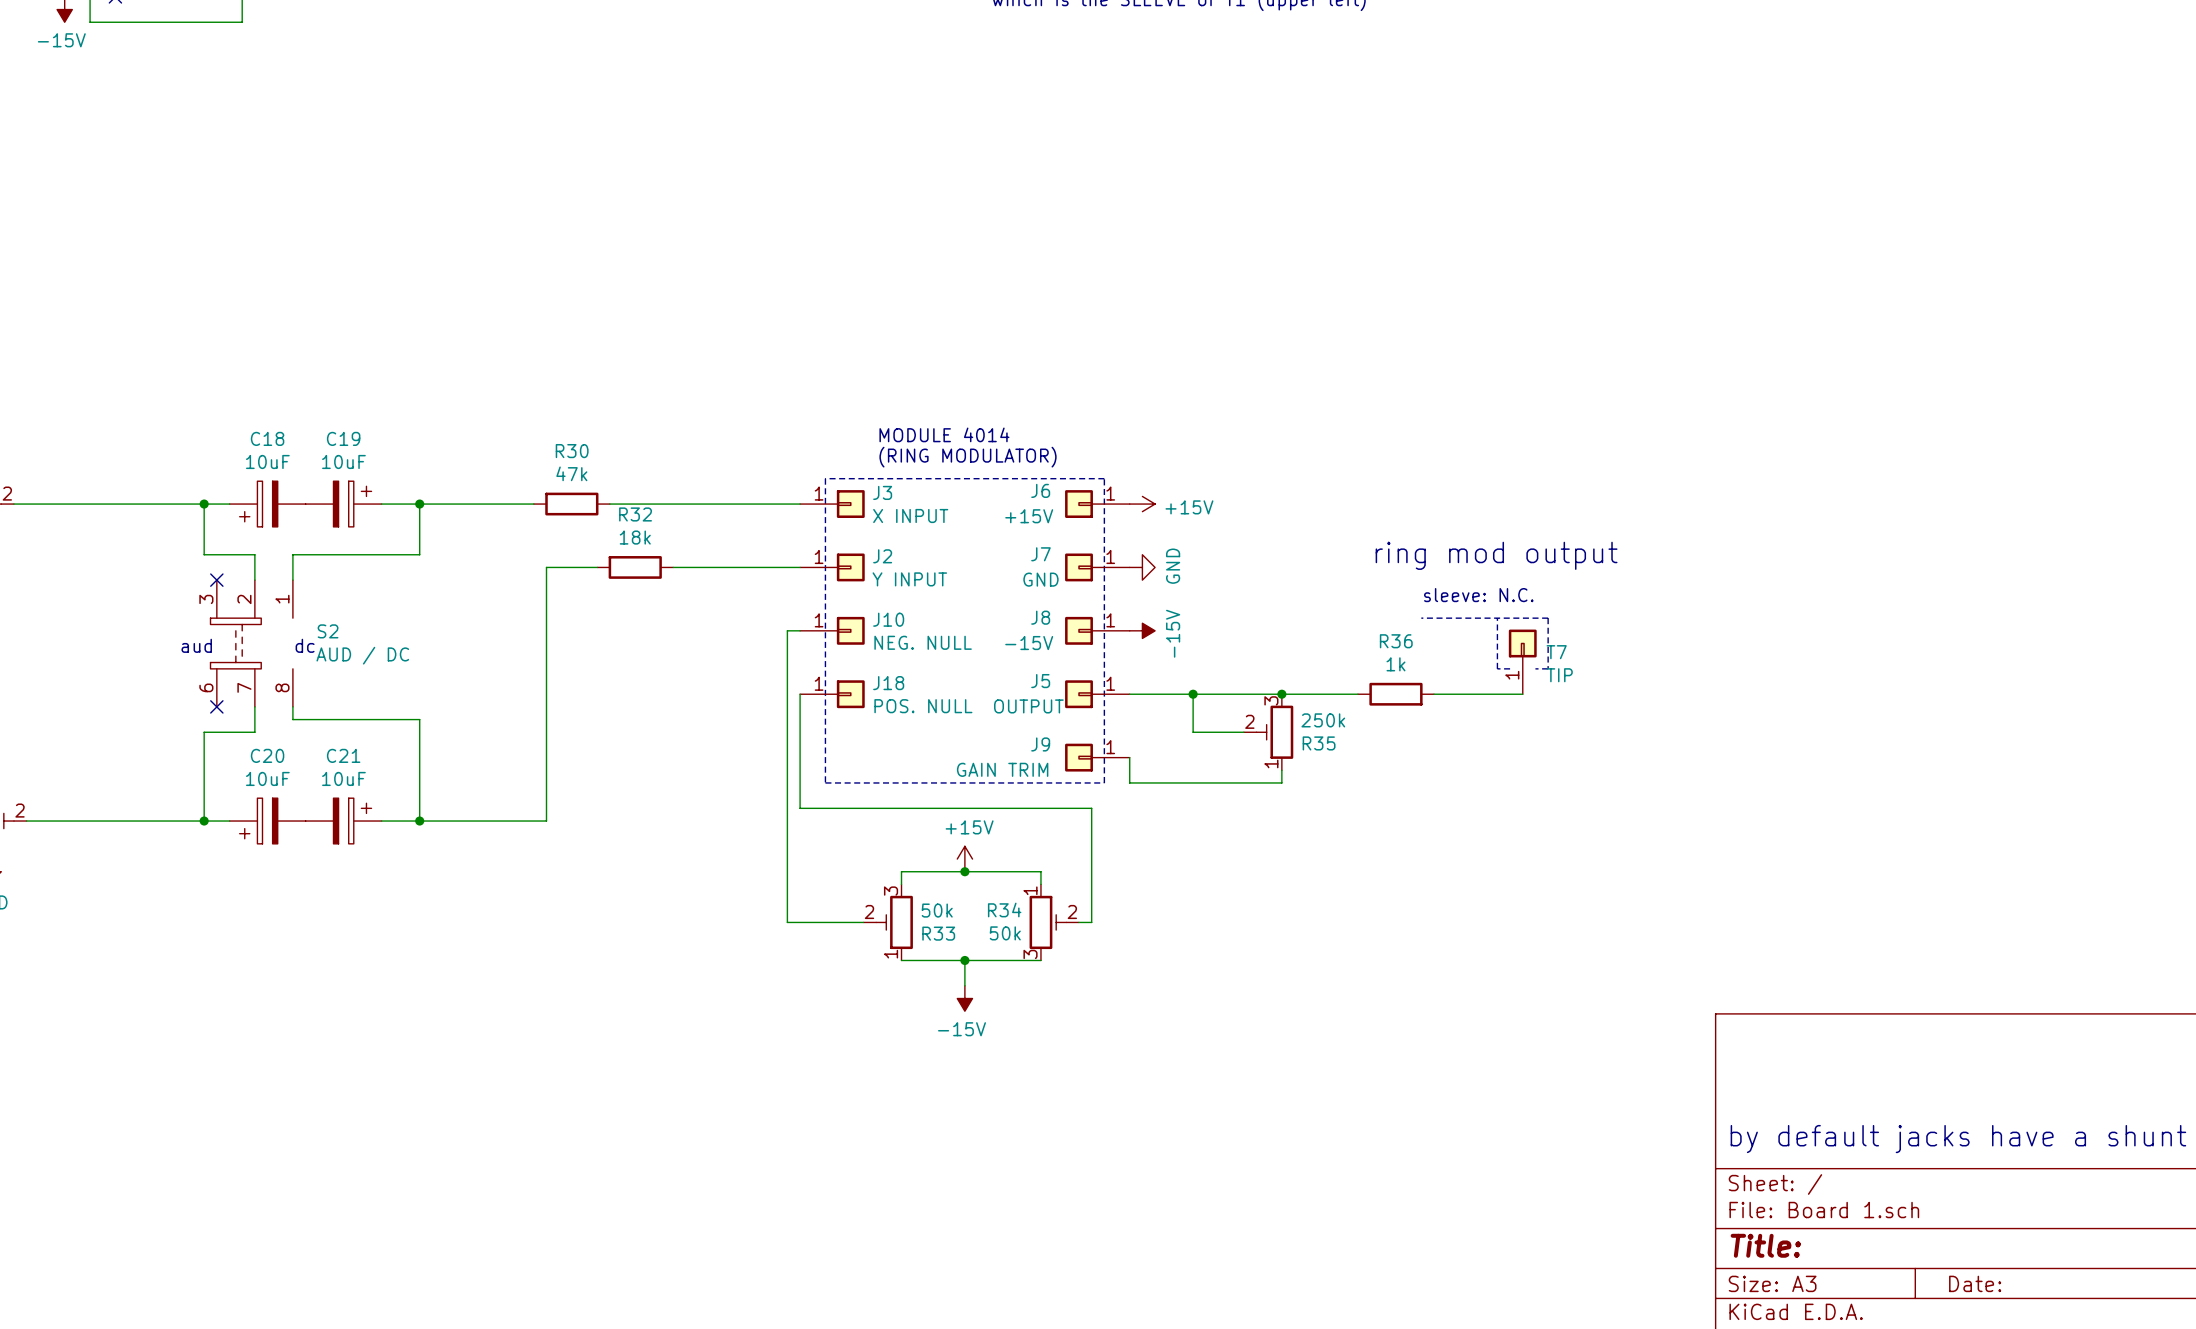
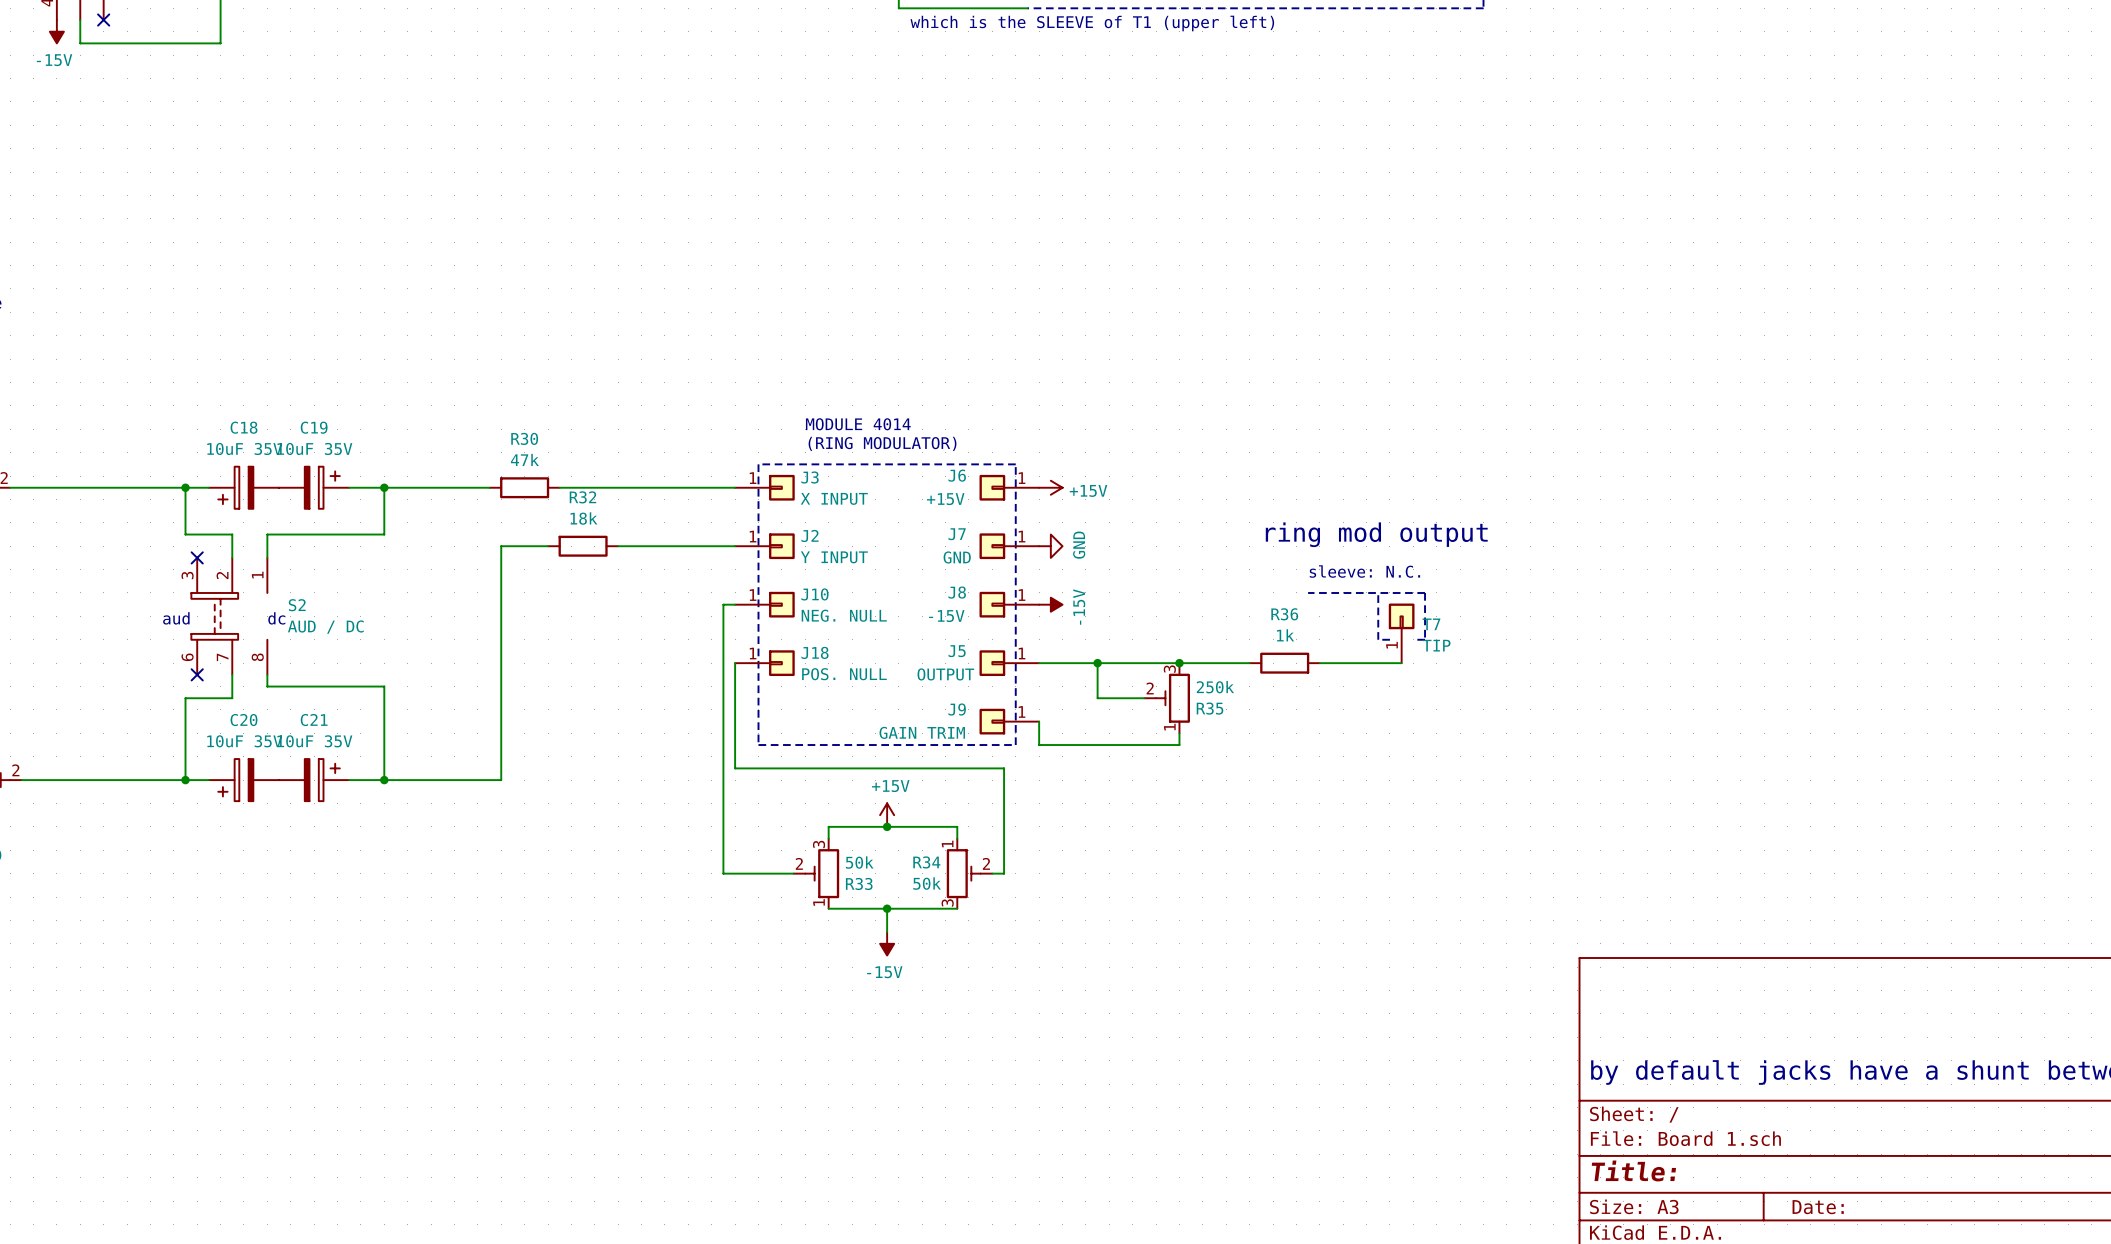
C18 value: 10uF (267, 461) -> 10uF 35V (244, 448)
C19 value: 10uF (343, 461) -> 10uF 35V (314, 448)
C20 value: 10uF (267, 778) -> 10uF 35V (244, 741)
C21 value: 10uF (343, 778) -> 10uF 35V (314, 741)

